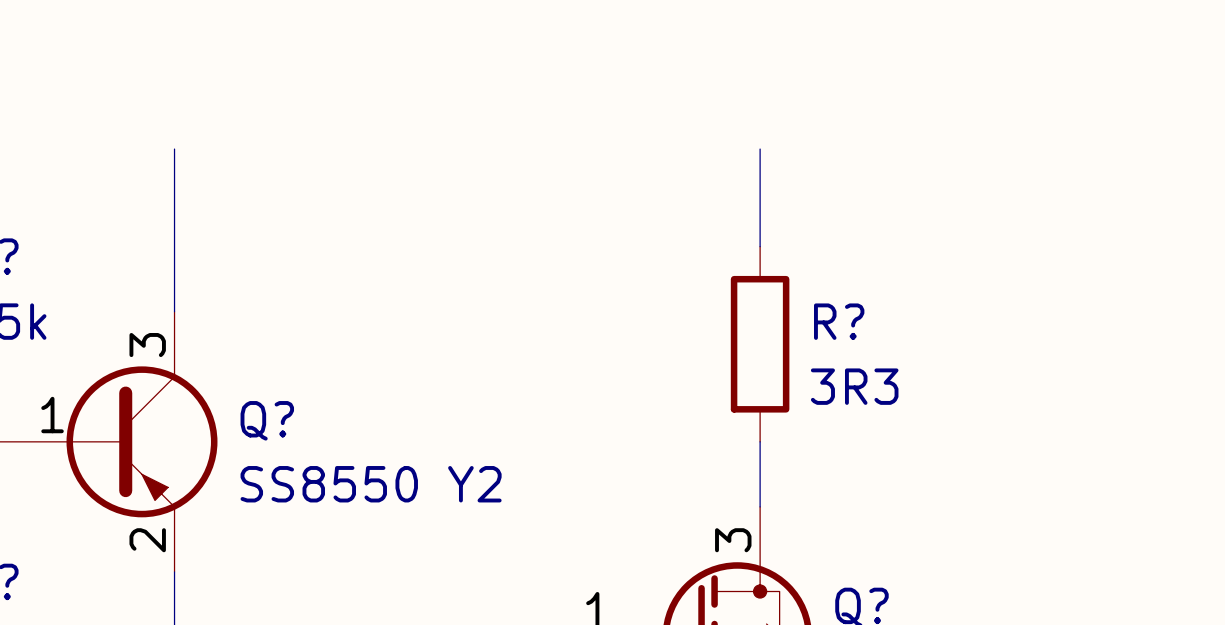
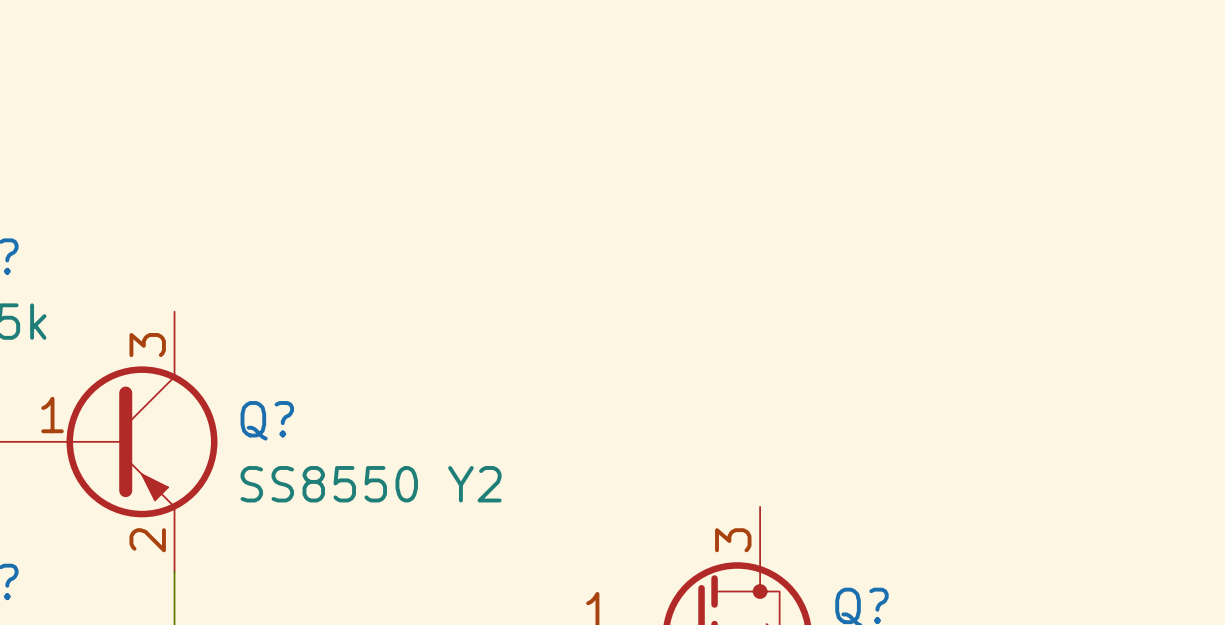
wire: (174, 149) (174, 311) -> none
wire: (760, 149) (760, 246) -> none
R?: 3R3 (760, 344) -> none
wire: (760, 441) (760, 506) -> none

